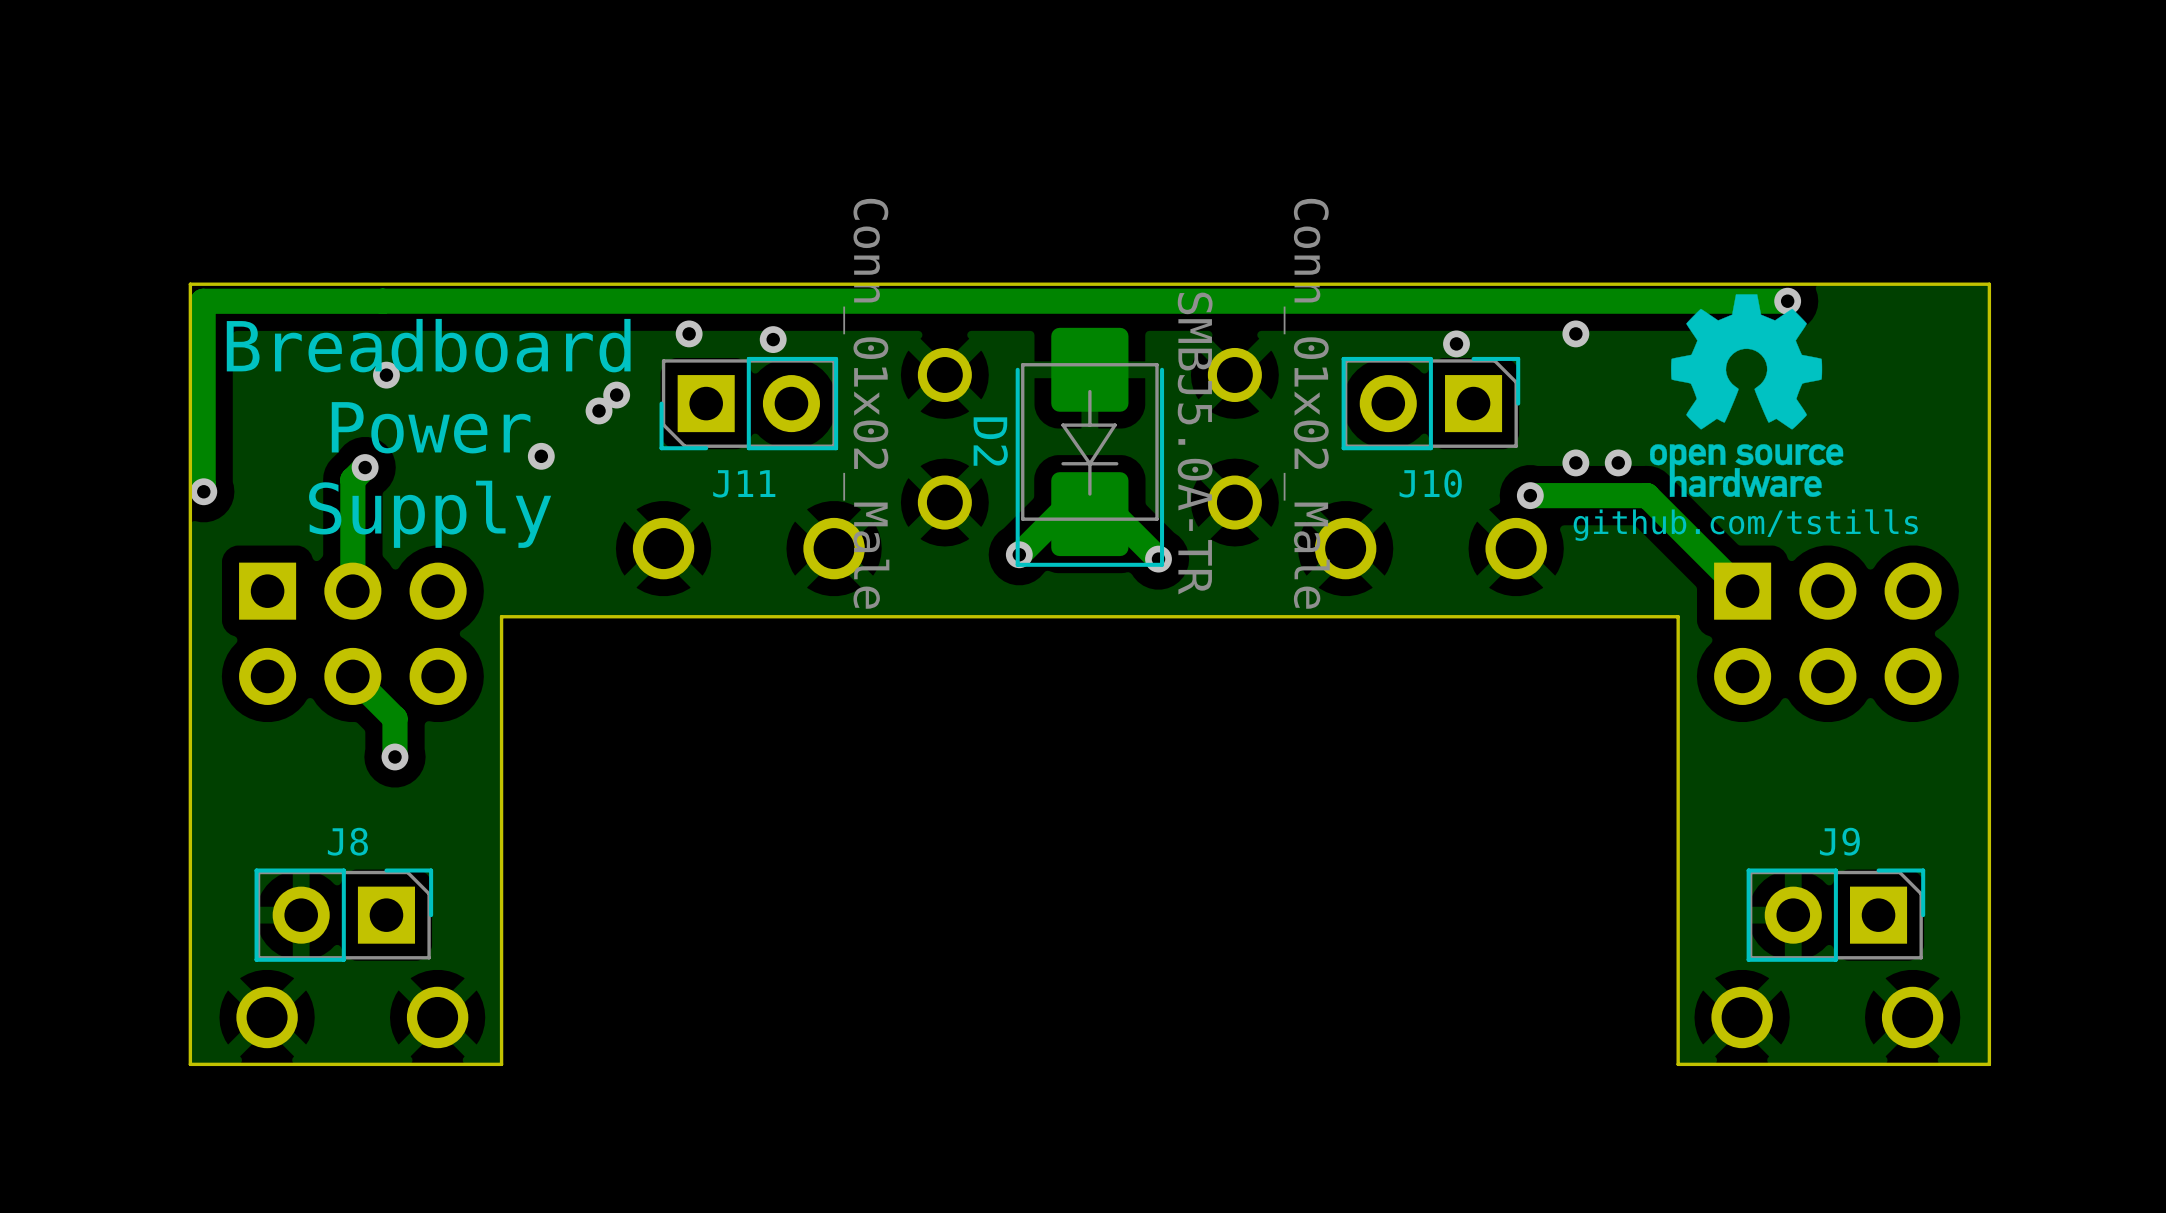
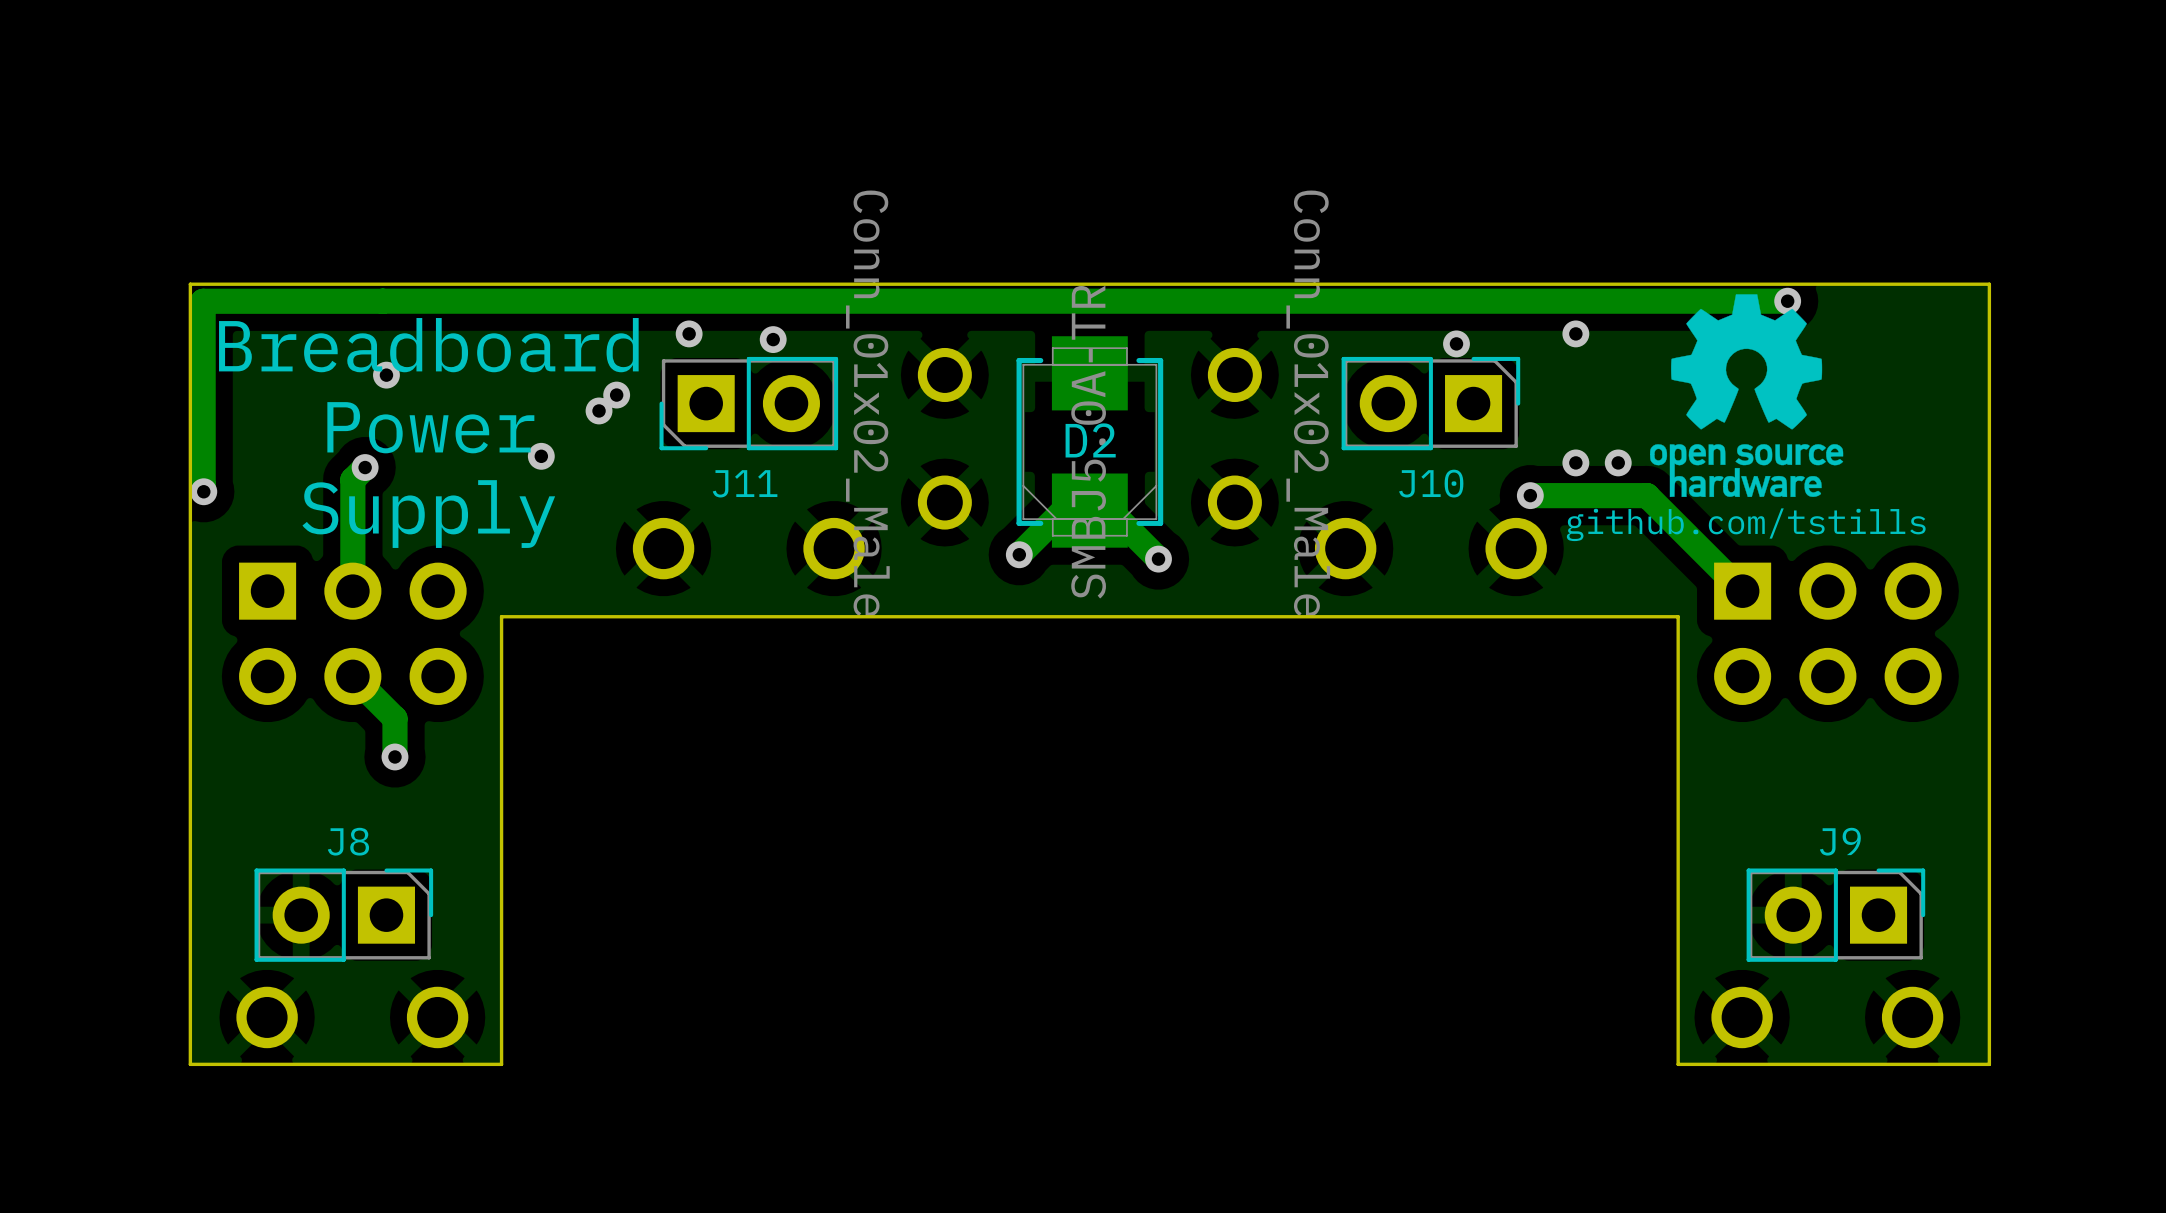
D2 footprint: [1015, 327, 1165, 567] -> [1016, 336, 1164, 548]
D2 name position: D2 (990, 441) -> D2 (1090, 440)
D2 value position: SMBJ5.0A-TR (1195, 443) -> SMBJ5.0A-TR (1088, 442)

